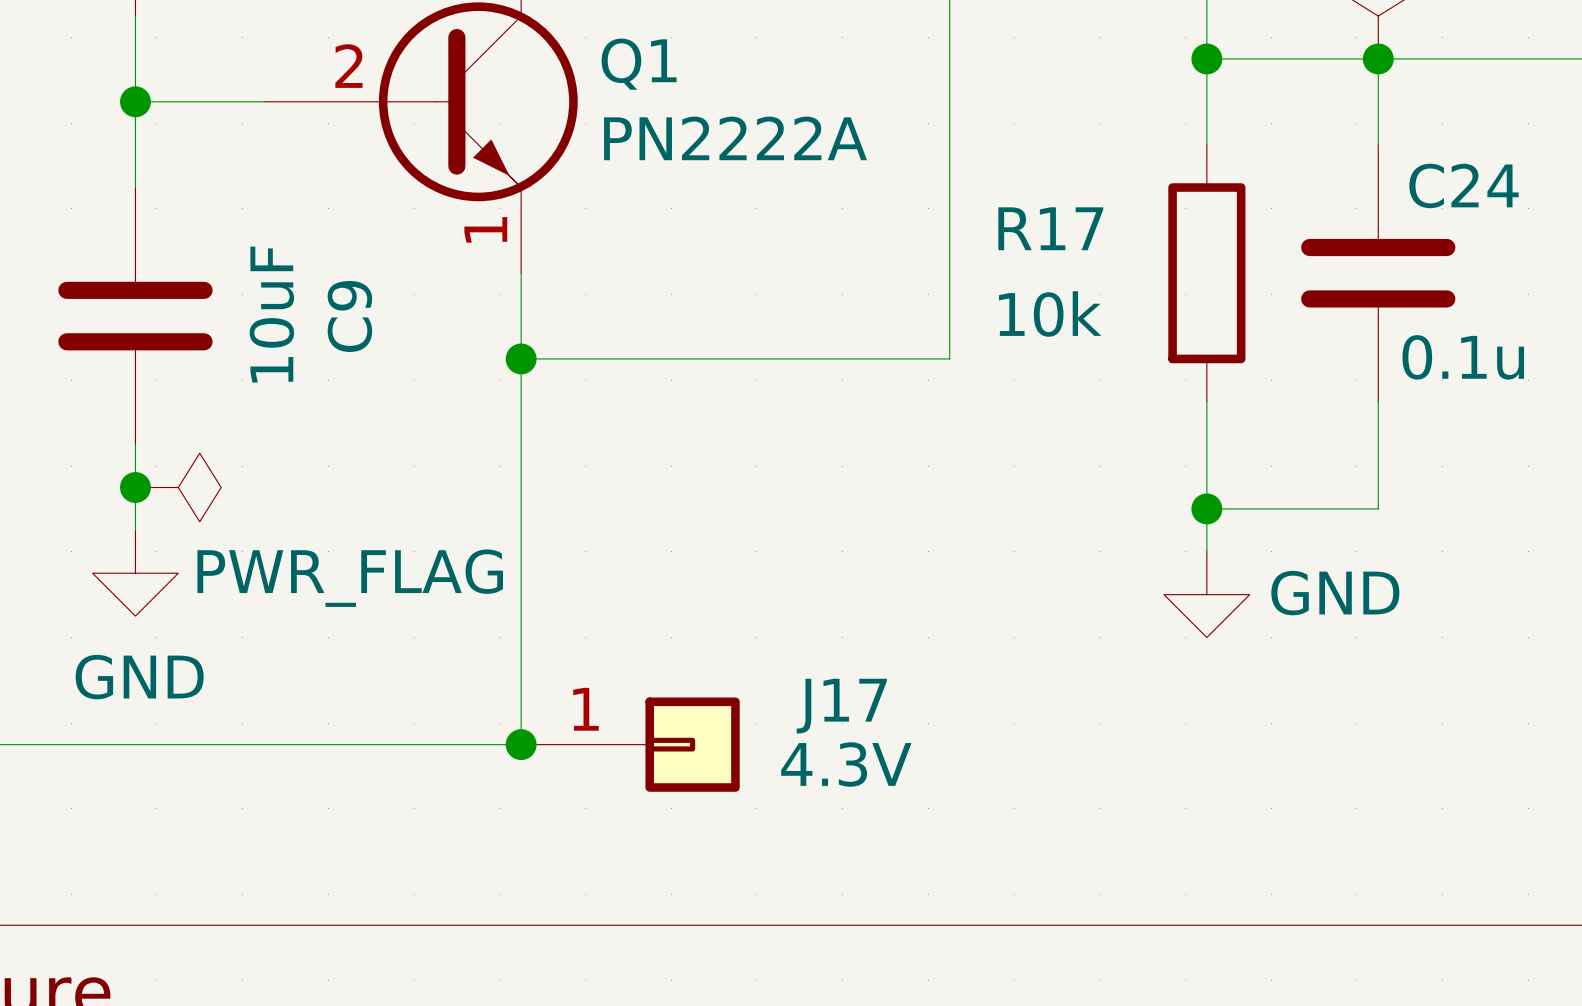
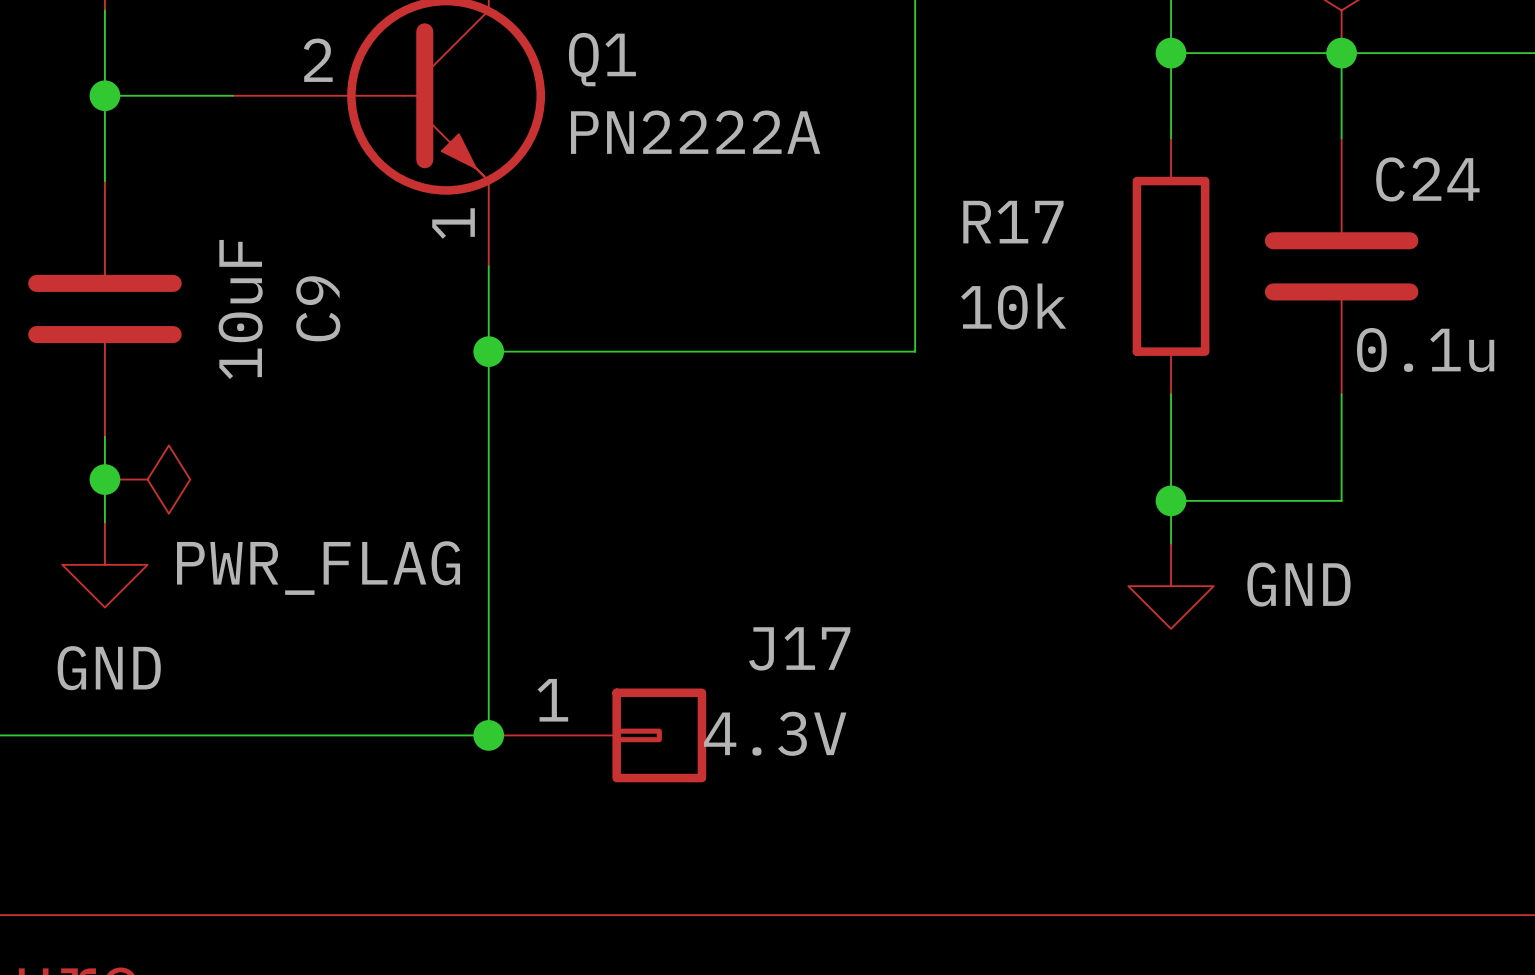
J17 name position: J17 (841, 706) -> J17 (799, 648)
J17 value position: 4.3V (846, 764) -> 4.3V (775, 733)

